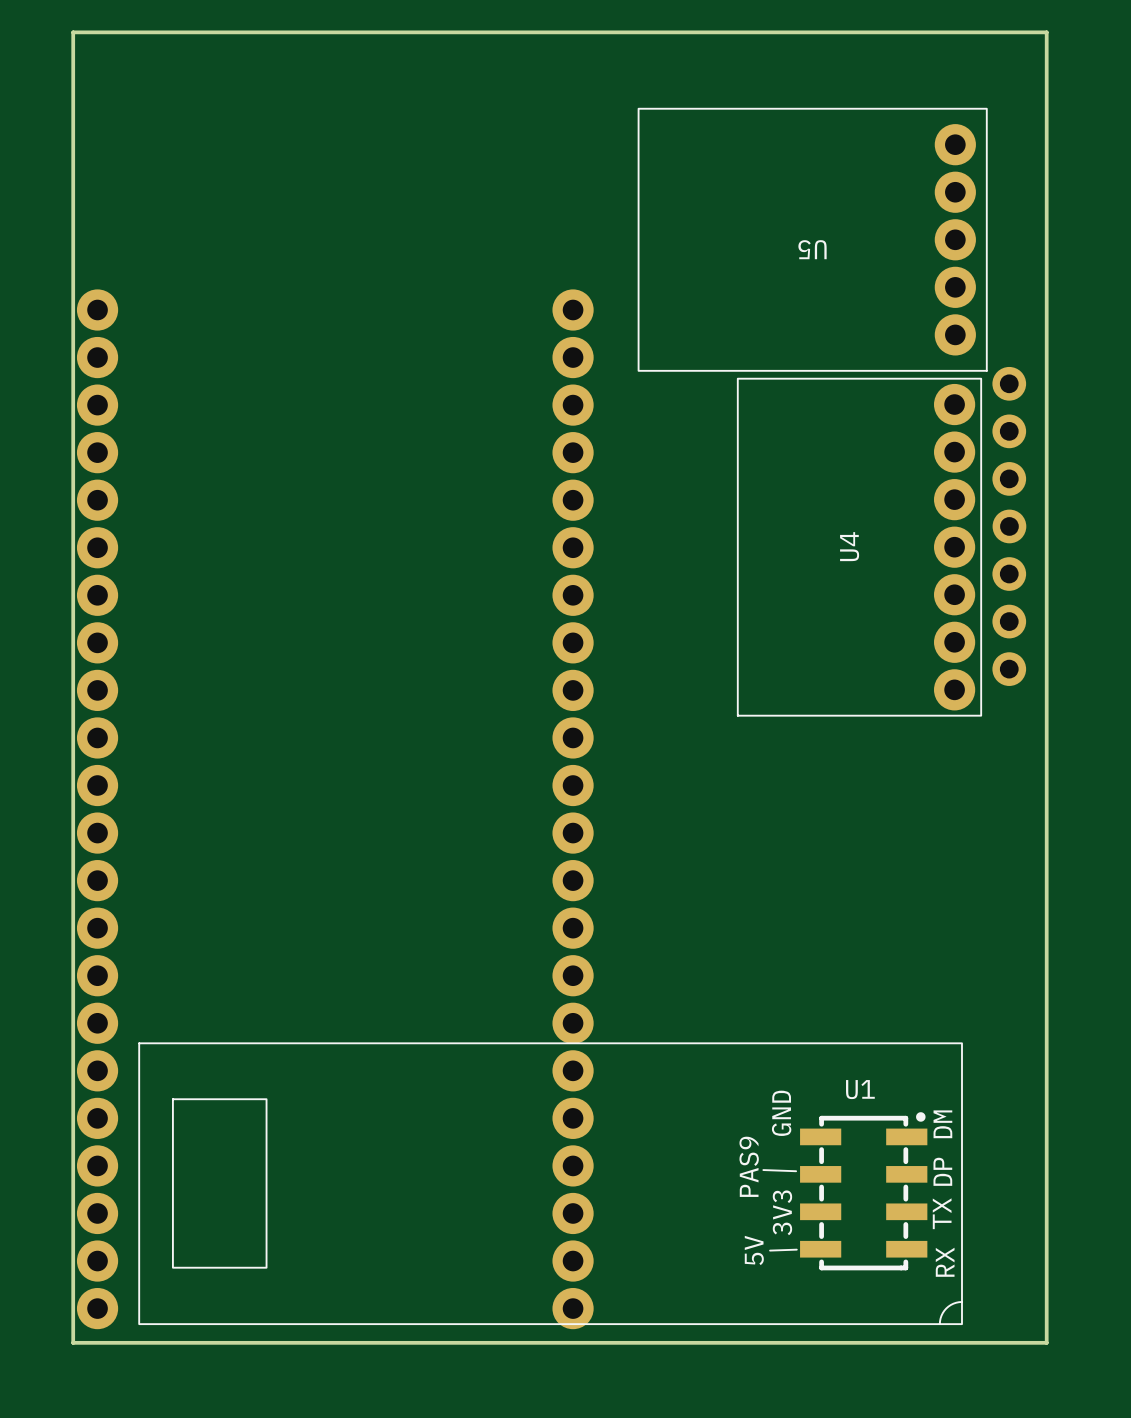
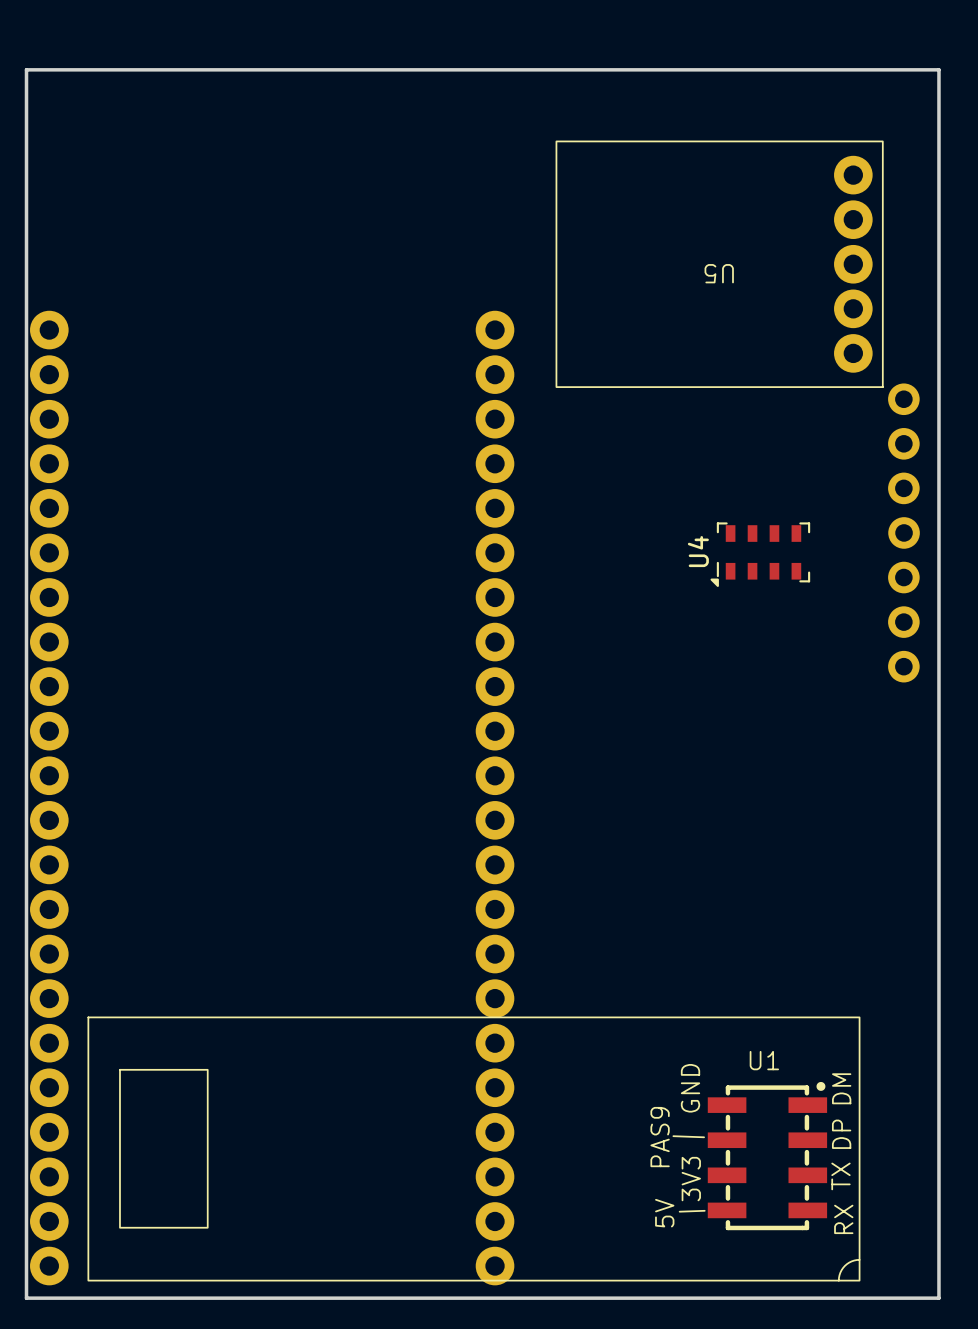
U4 footprint: [736, 377, 983, 717] -> [710, 522, 811, 587]
U4 name position: U4 (849, 546) -> U4 (698, 551)

